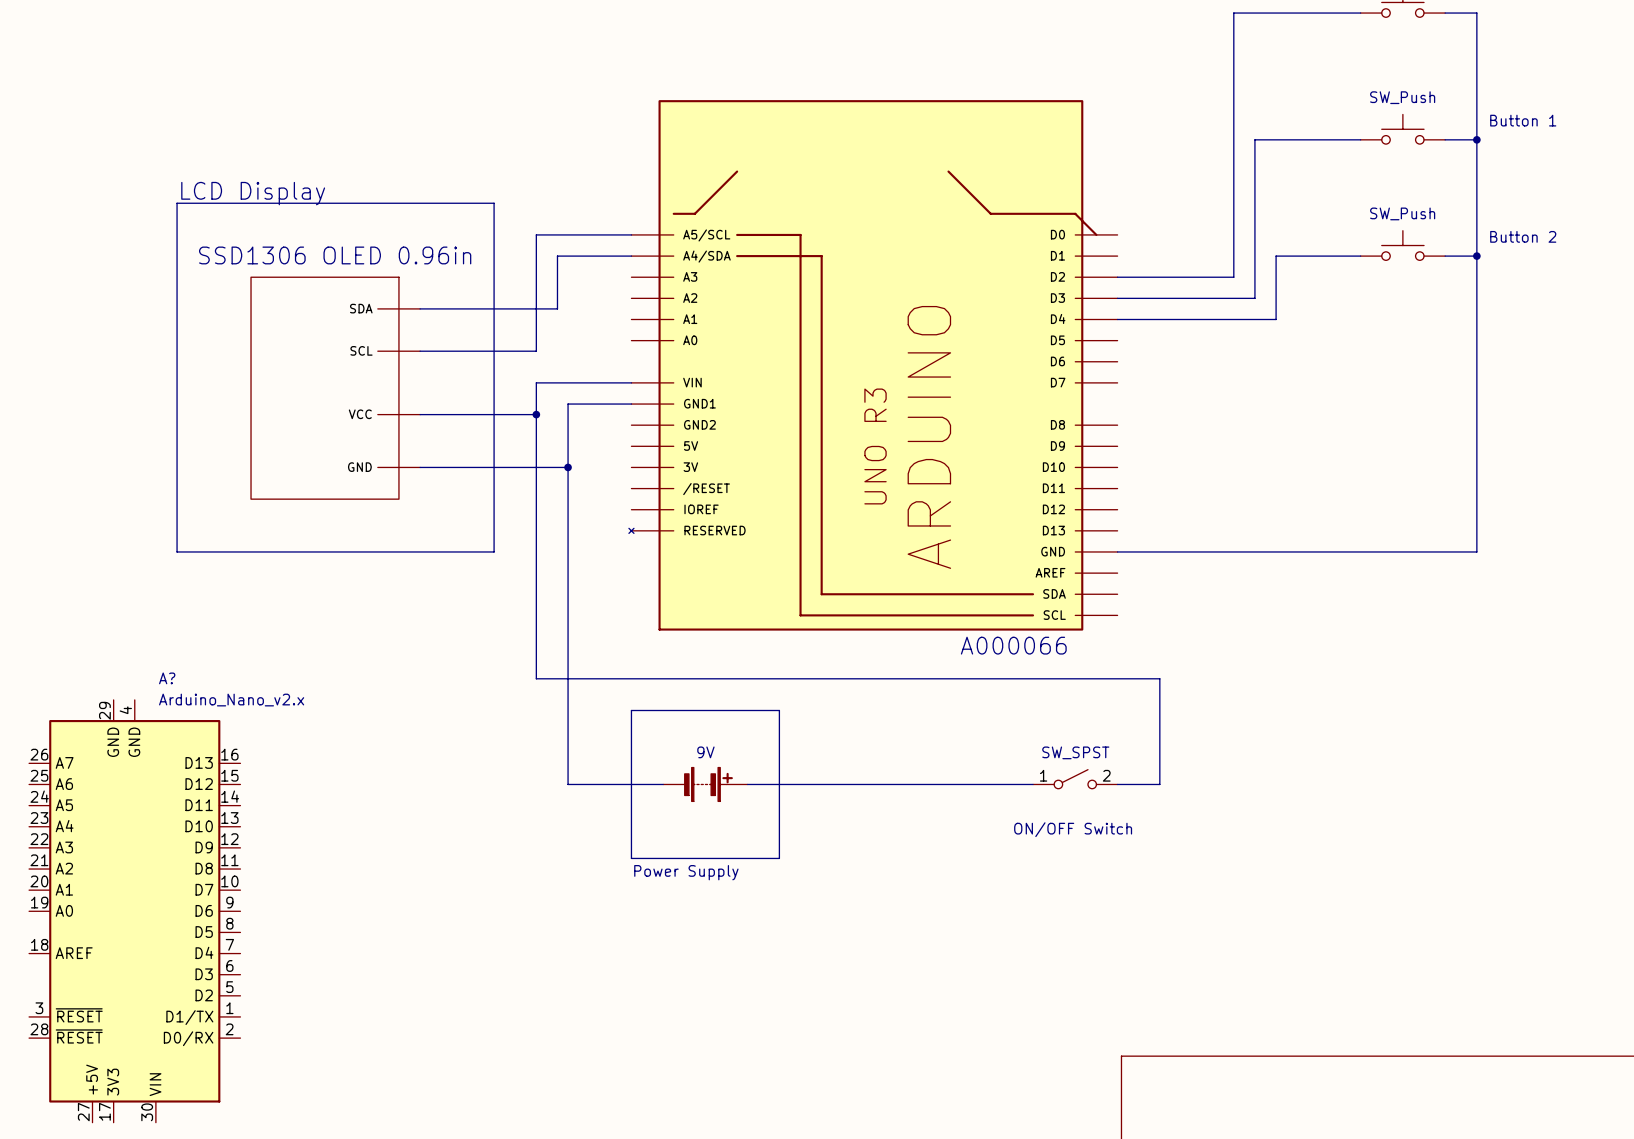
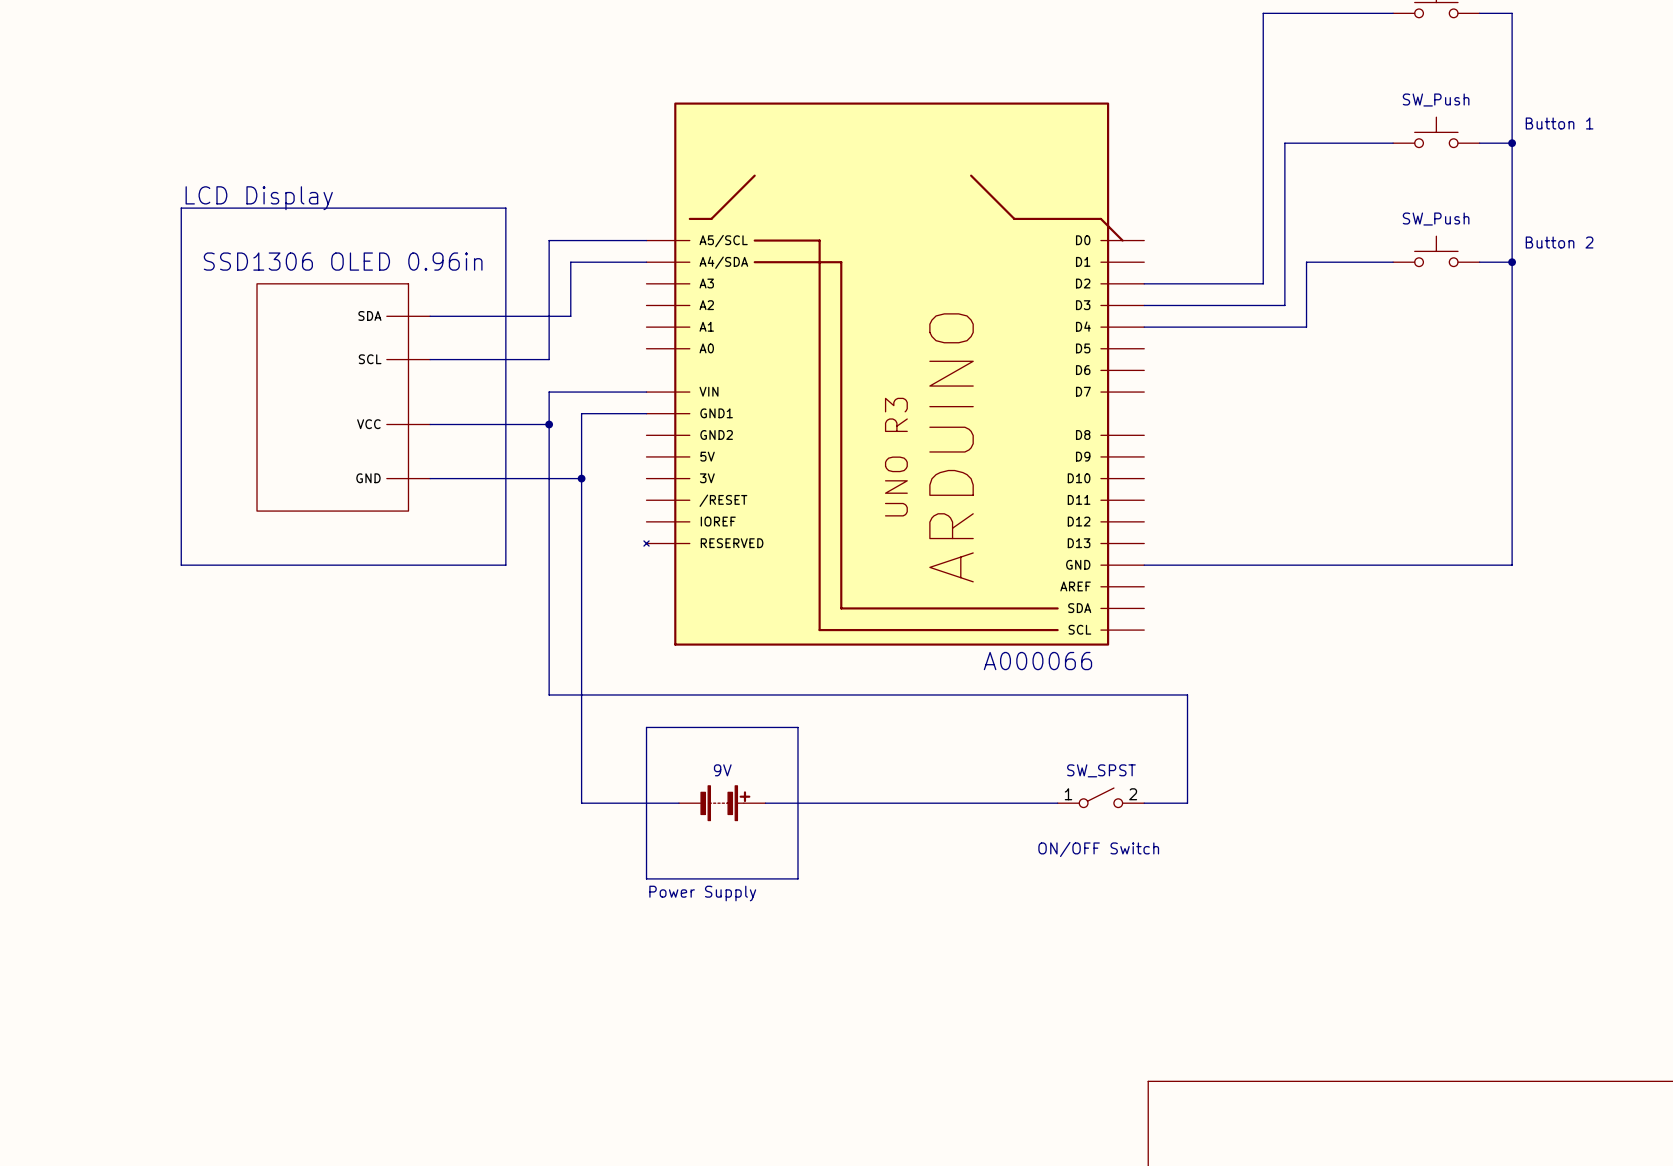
A?: Arduino_Nano_v2.x (134, 911) -> none

